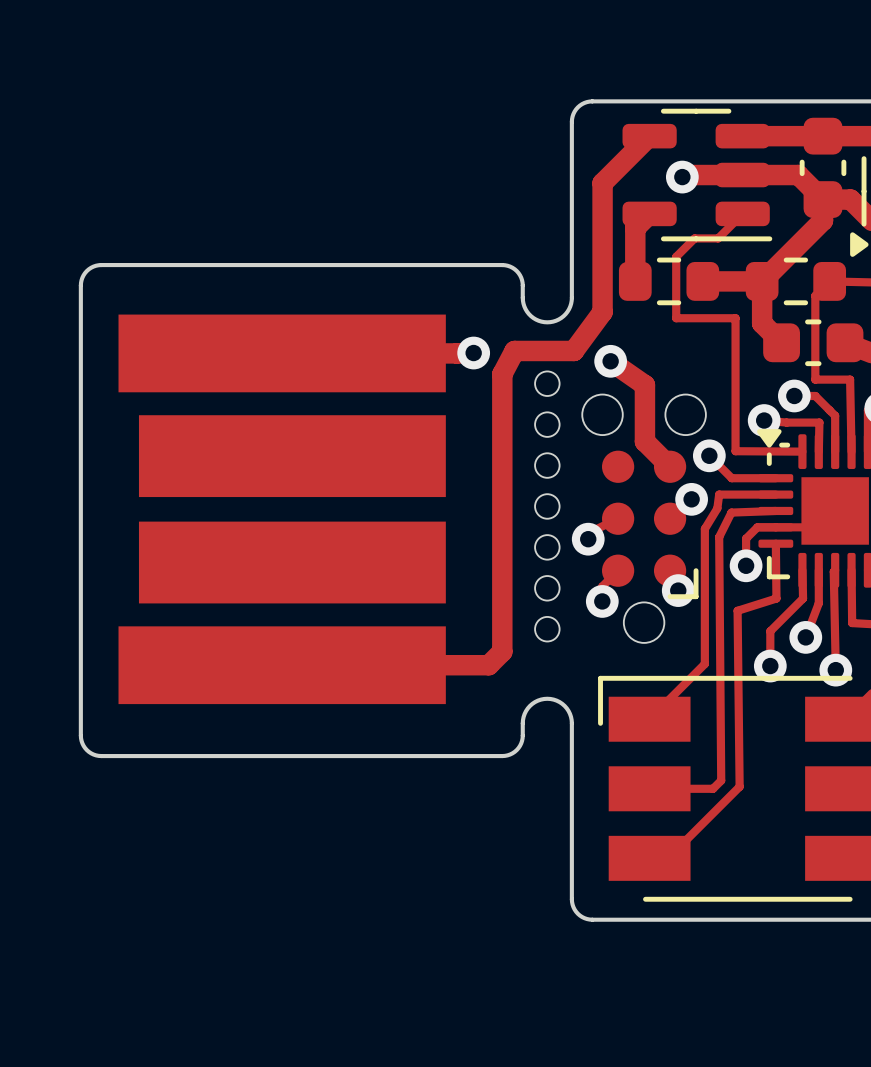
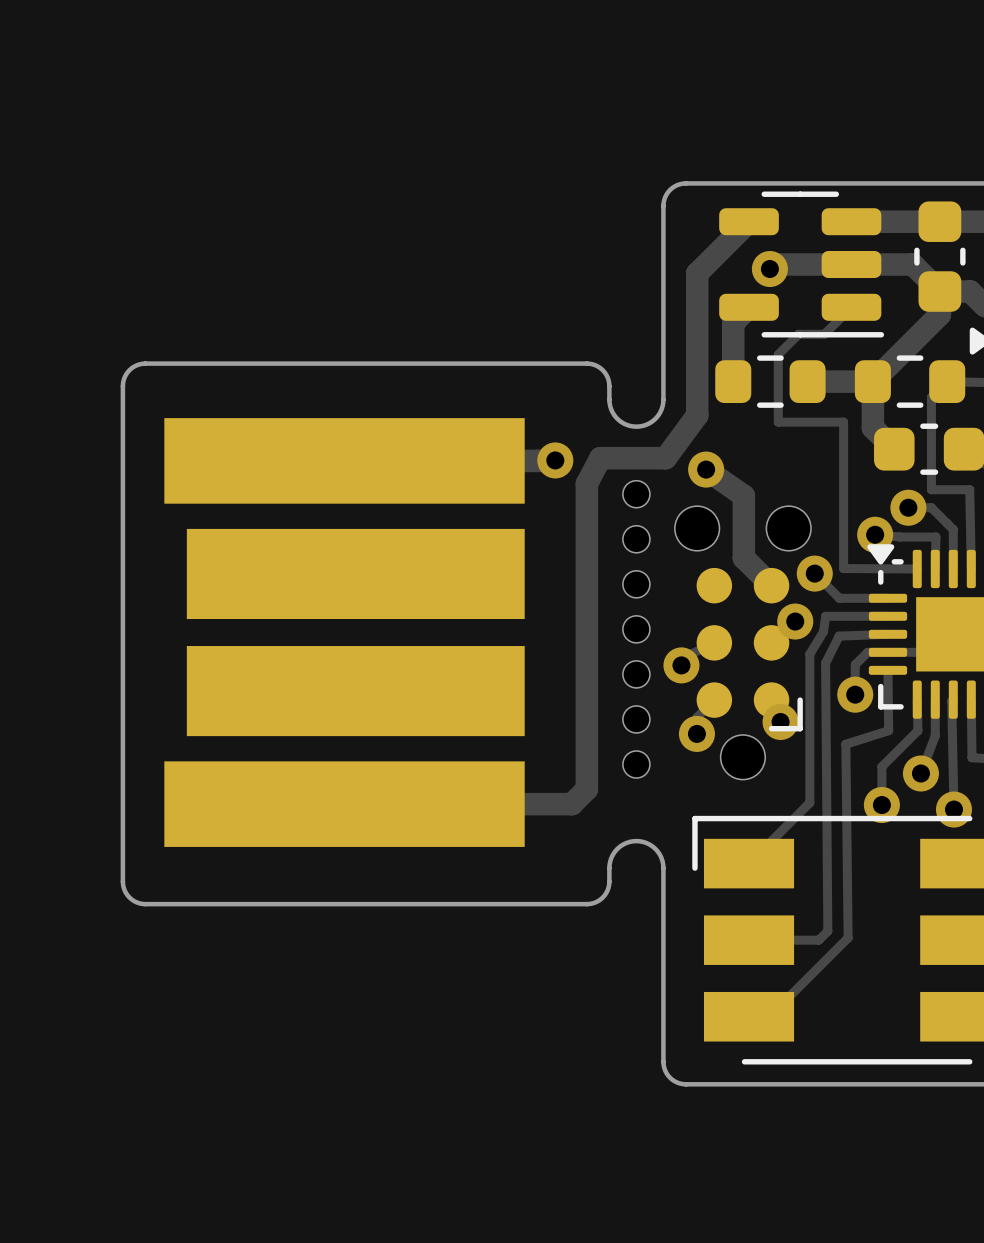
via position: (682, 177) -> (769, 269)

